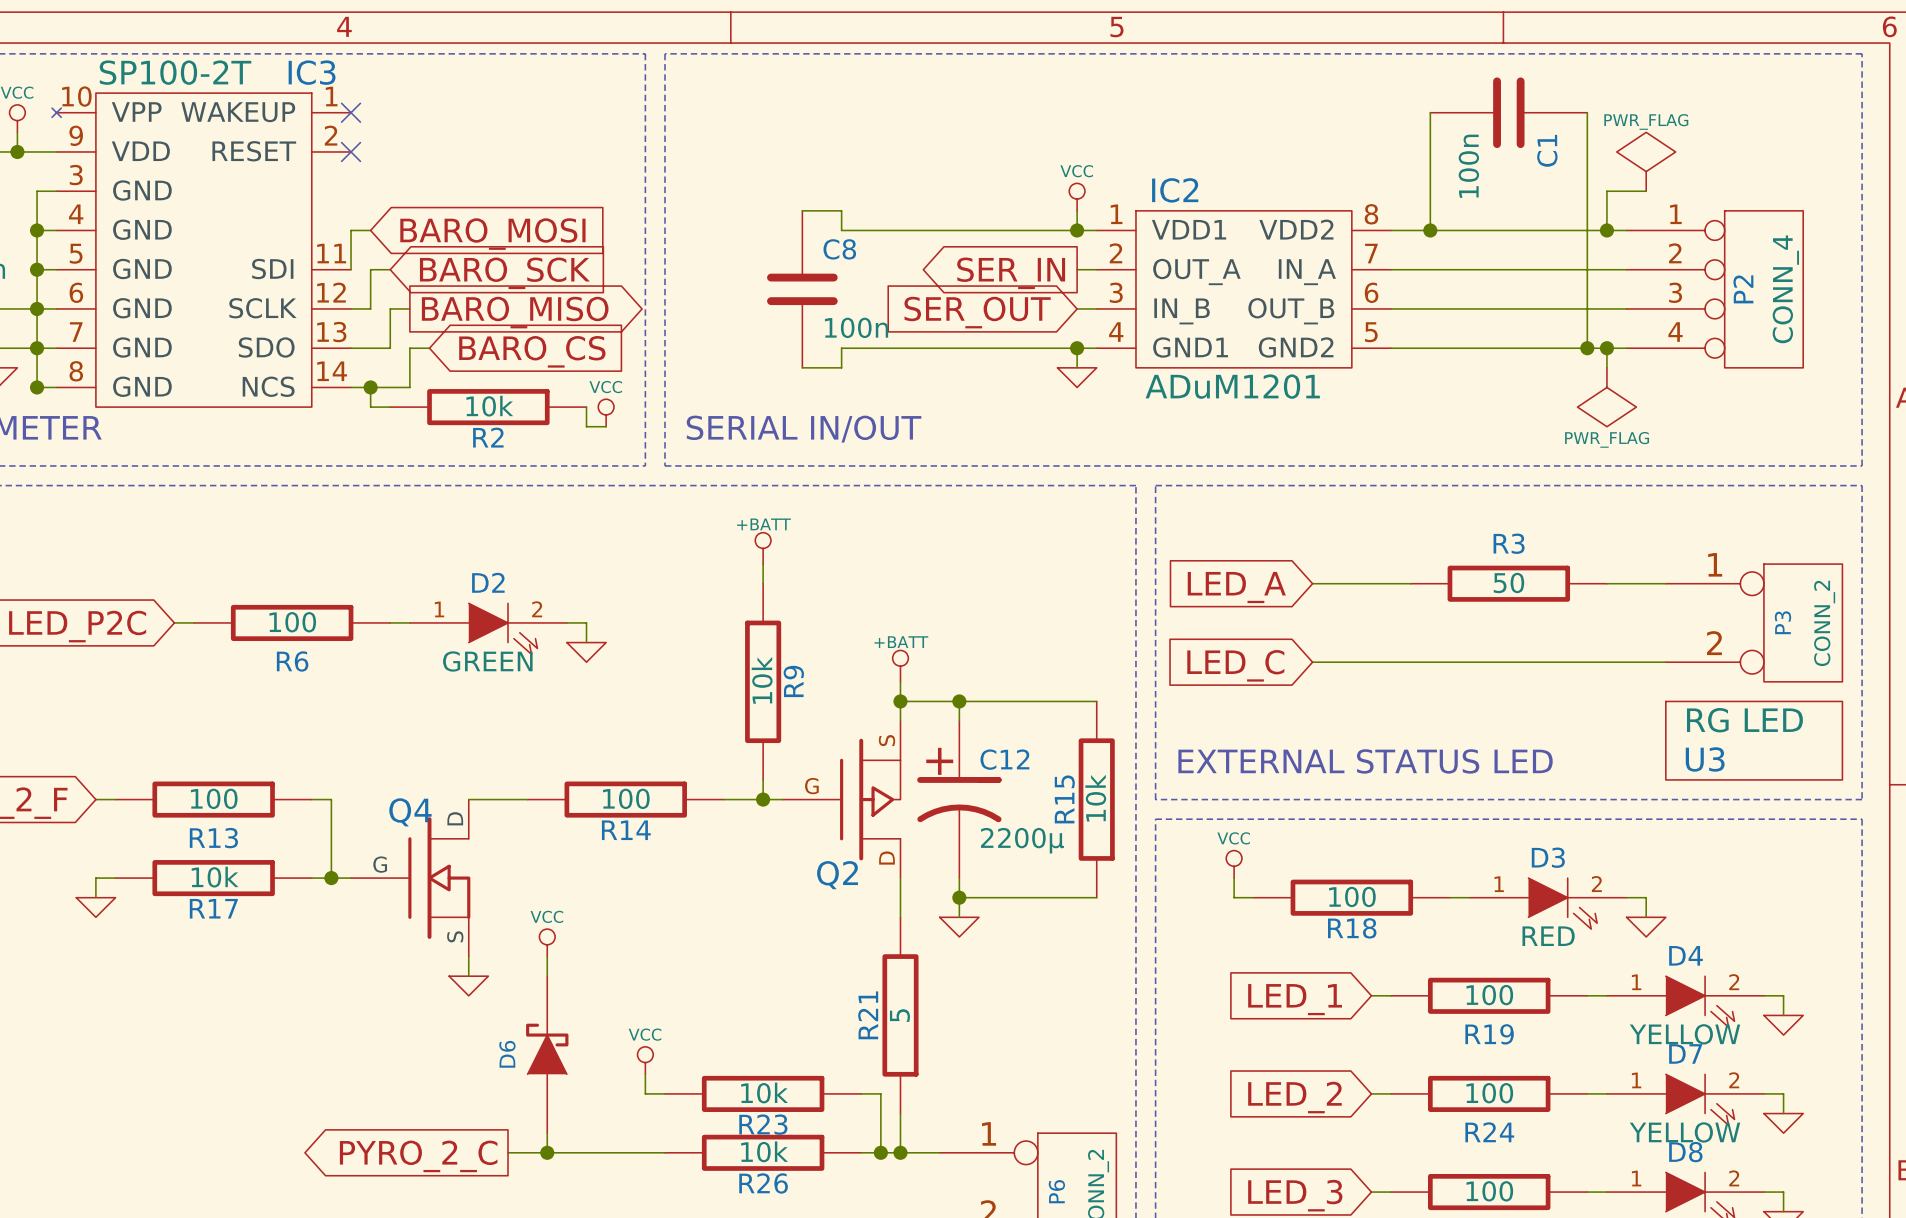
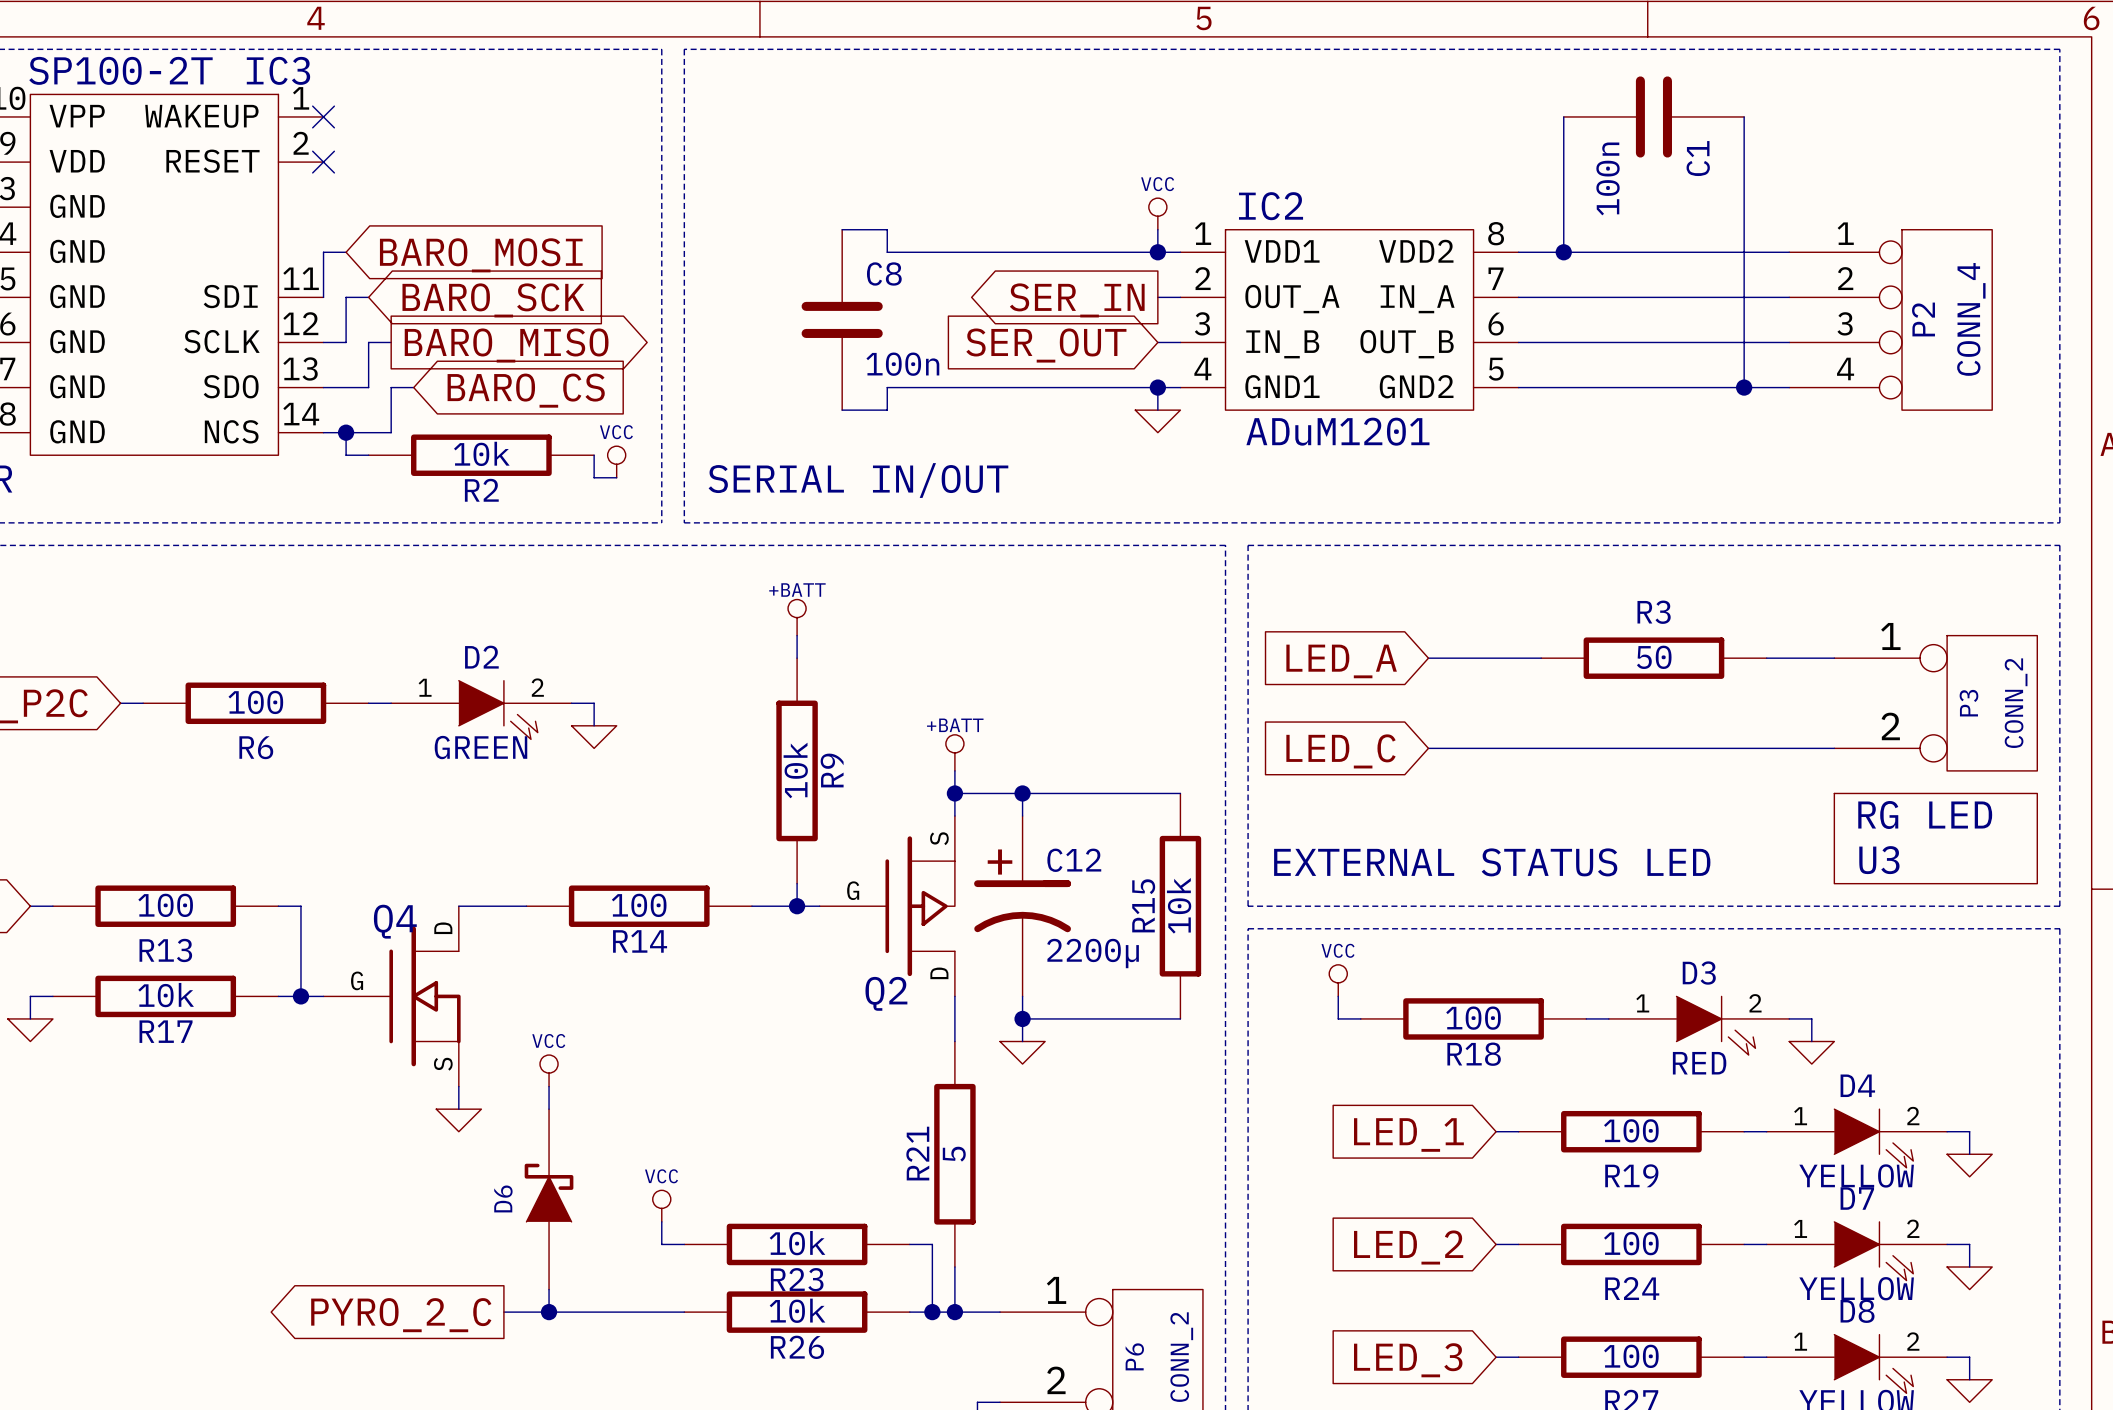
power symbol: PWR_FLAG (1646, 161) -> none
wire: (1646, 191) (1606, 191) (1606, 230) -> none
junction: (1606, 230) -> none
wire: (1606, 348) (1606, 367) -> none
junction: (1606, 348) -> none
power symbol: PWR_FLAG (1606, 397) -> none

